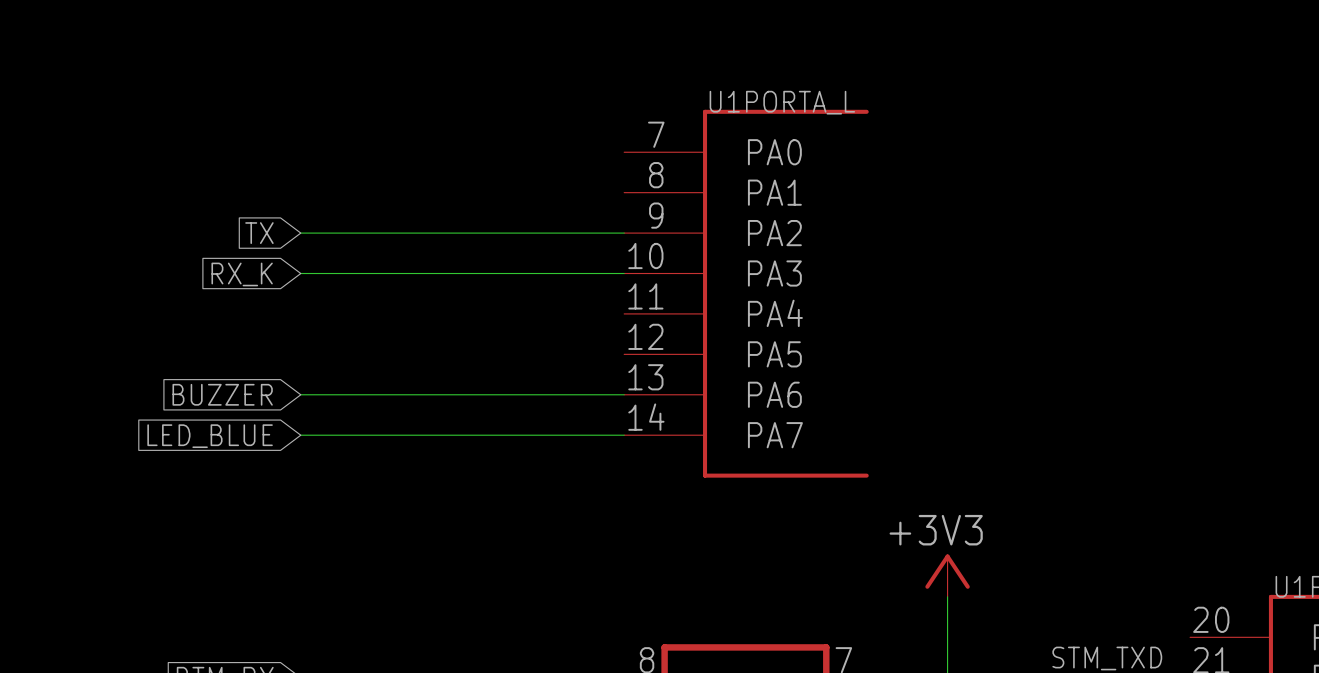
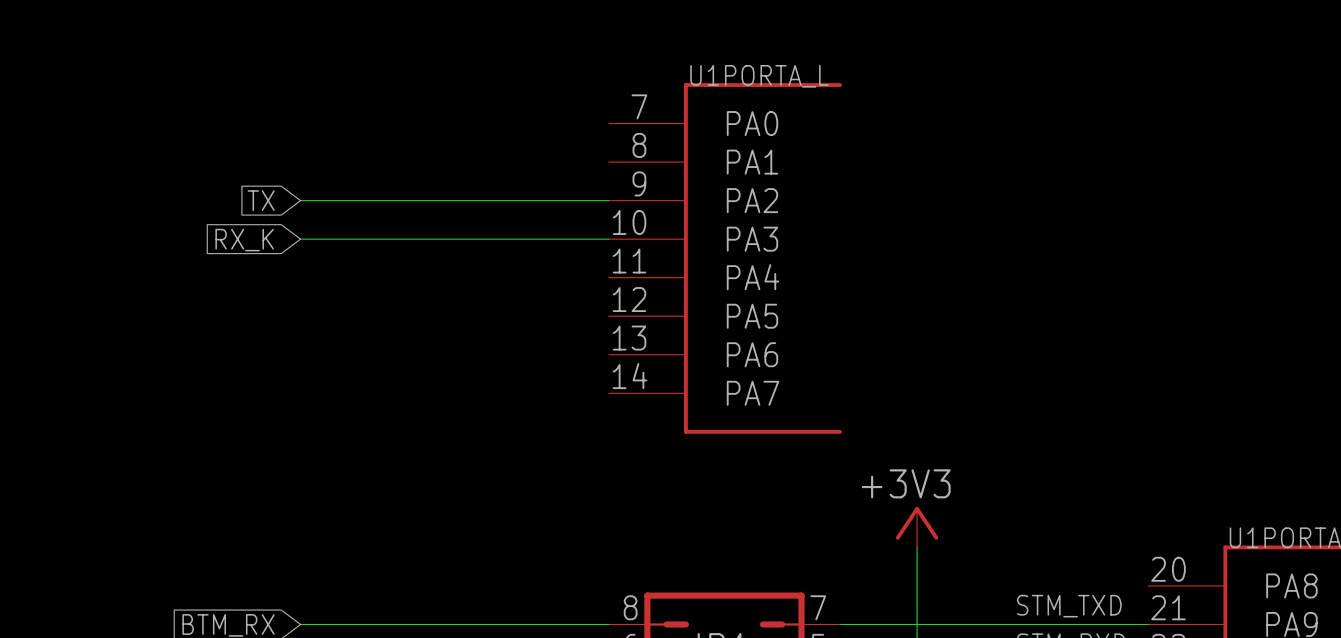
global label: BUZZER (222, 394) -> none
wire: (300, 394) (624, 394) -> none
wire: (300, 435) (624, 435) -> none
global label: LED_BLUE (210, 436) -> none

